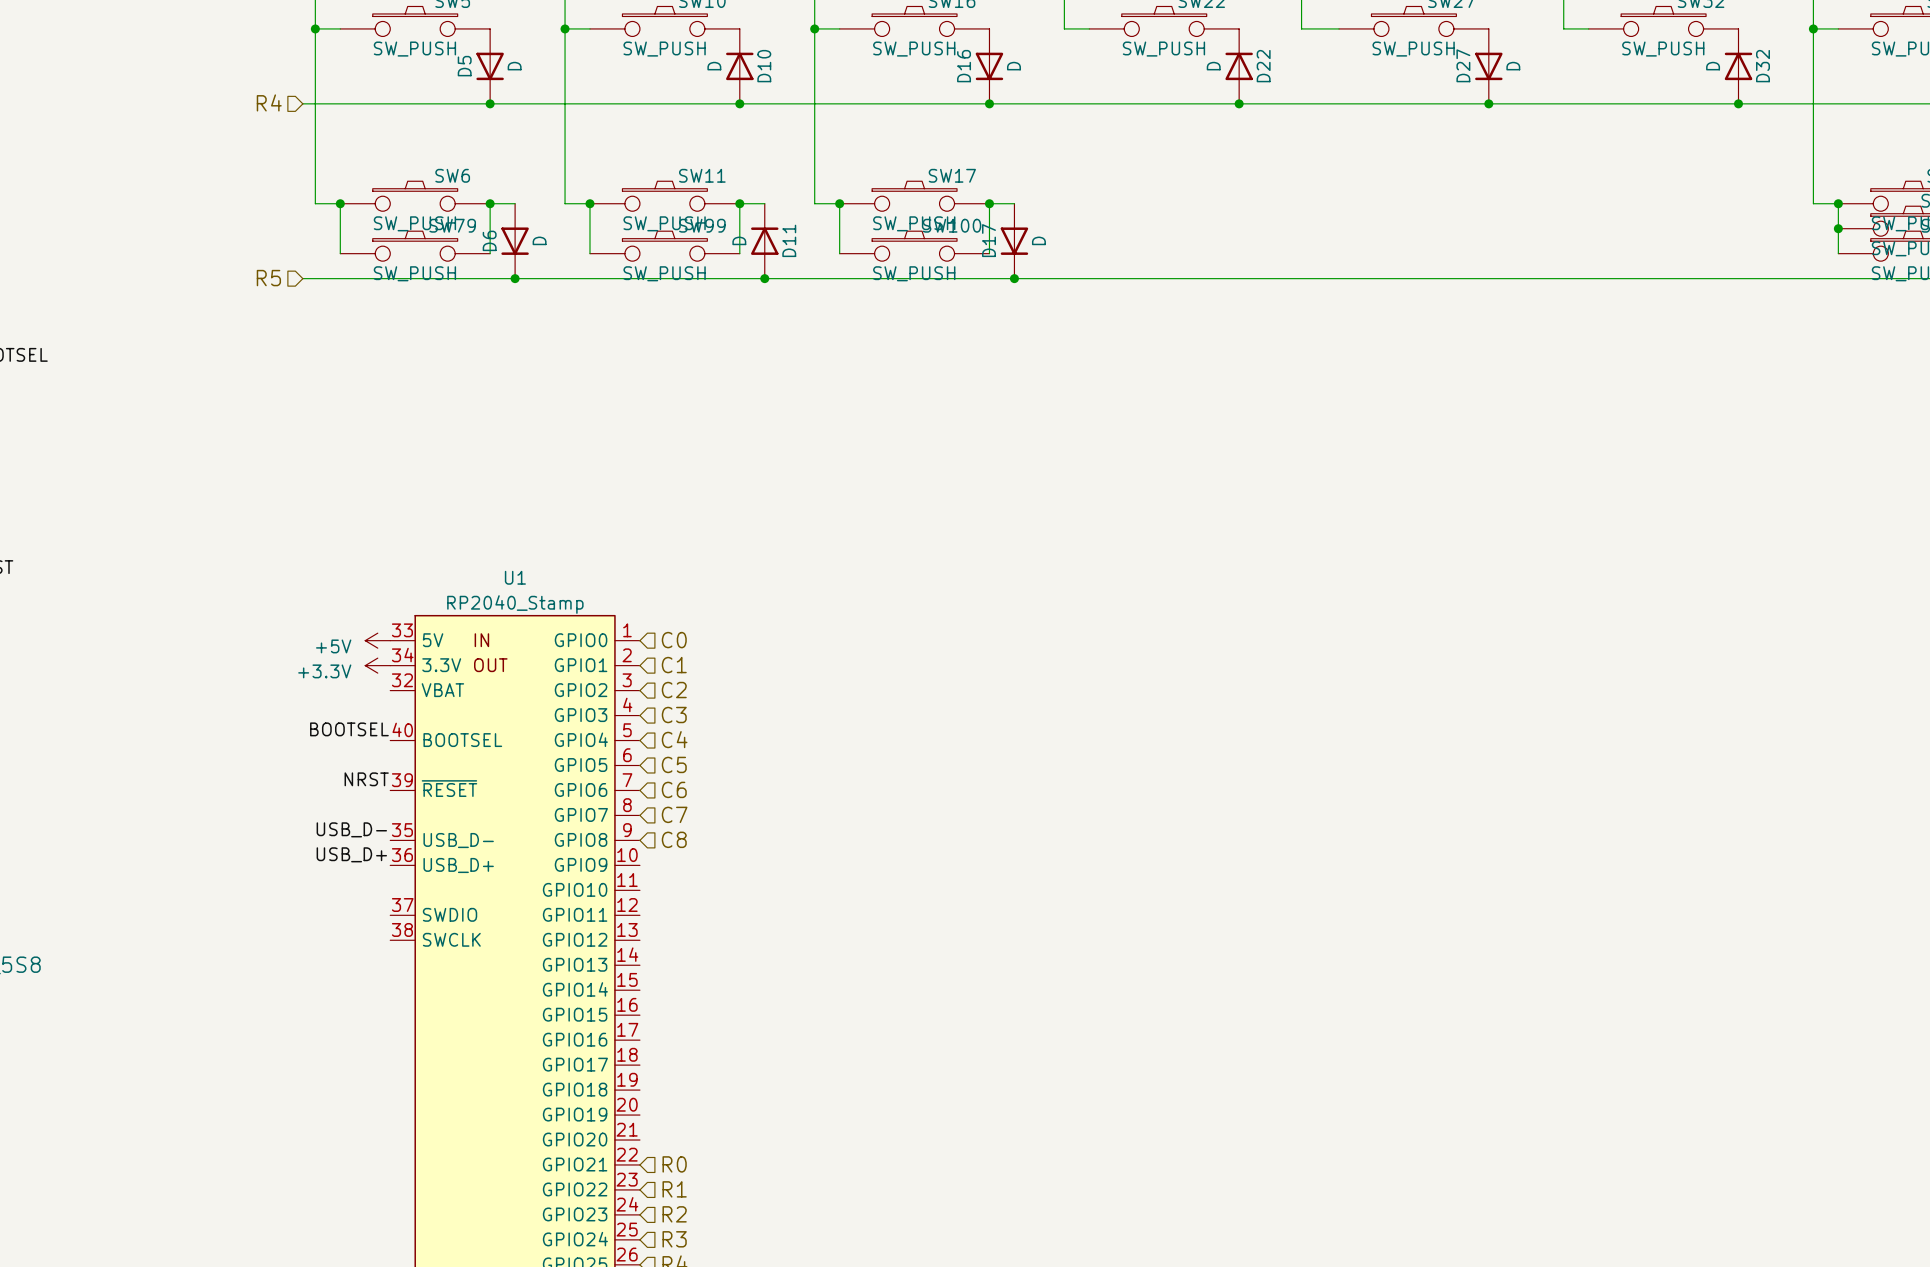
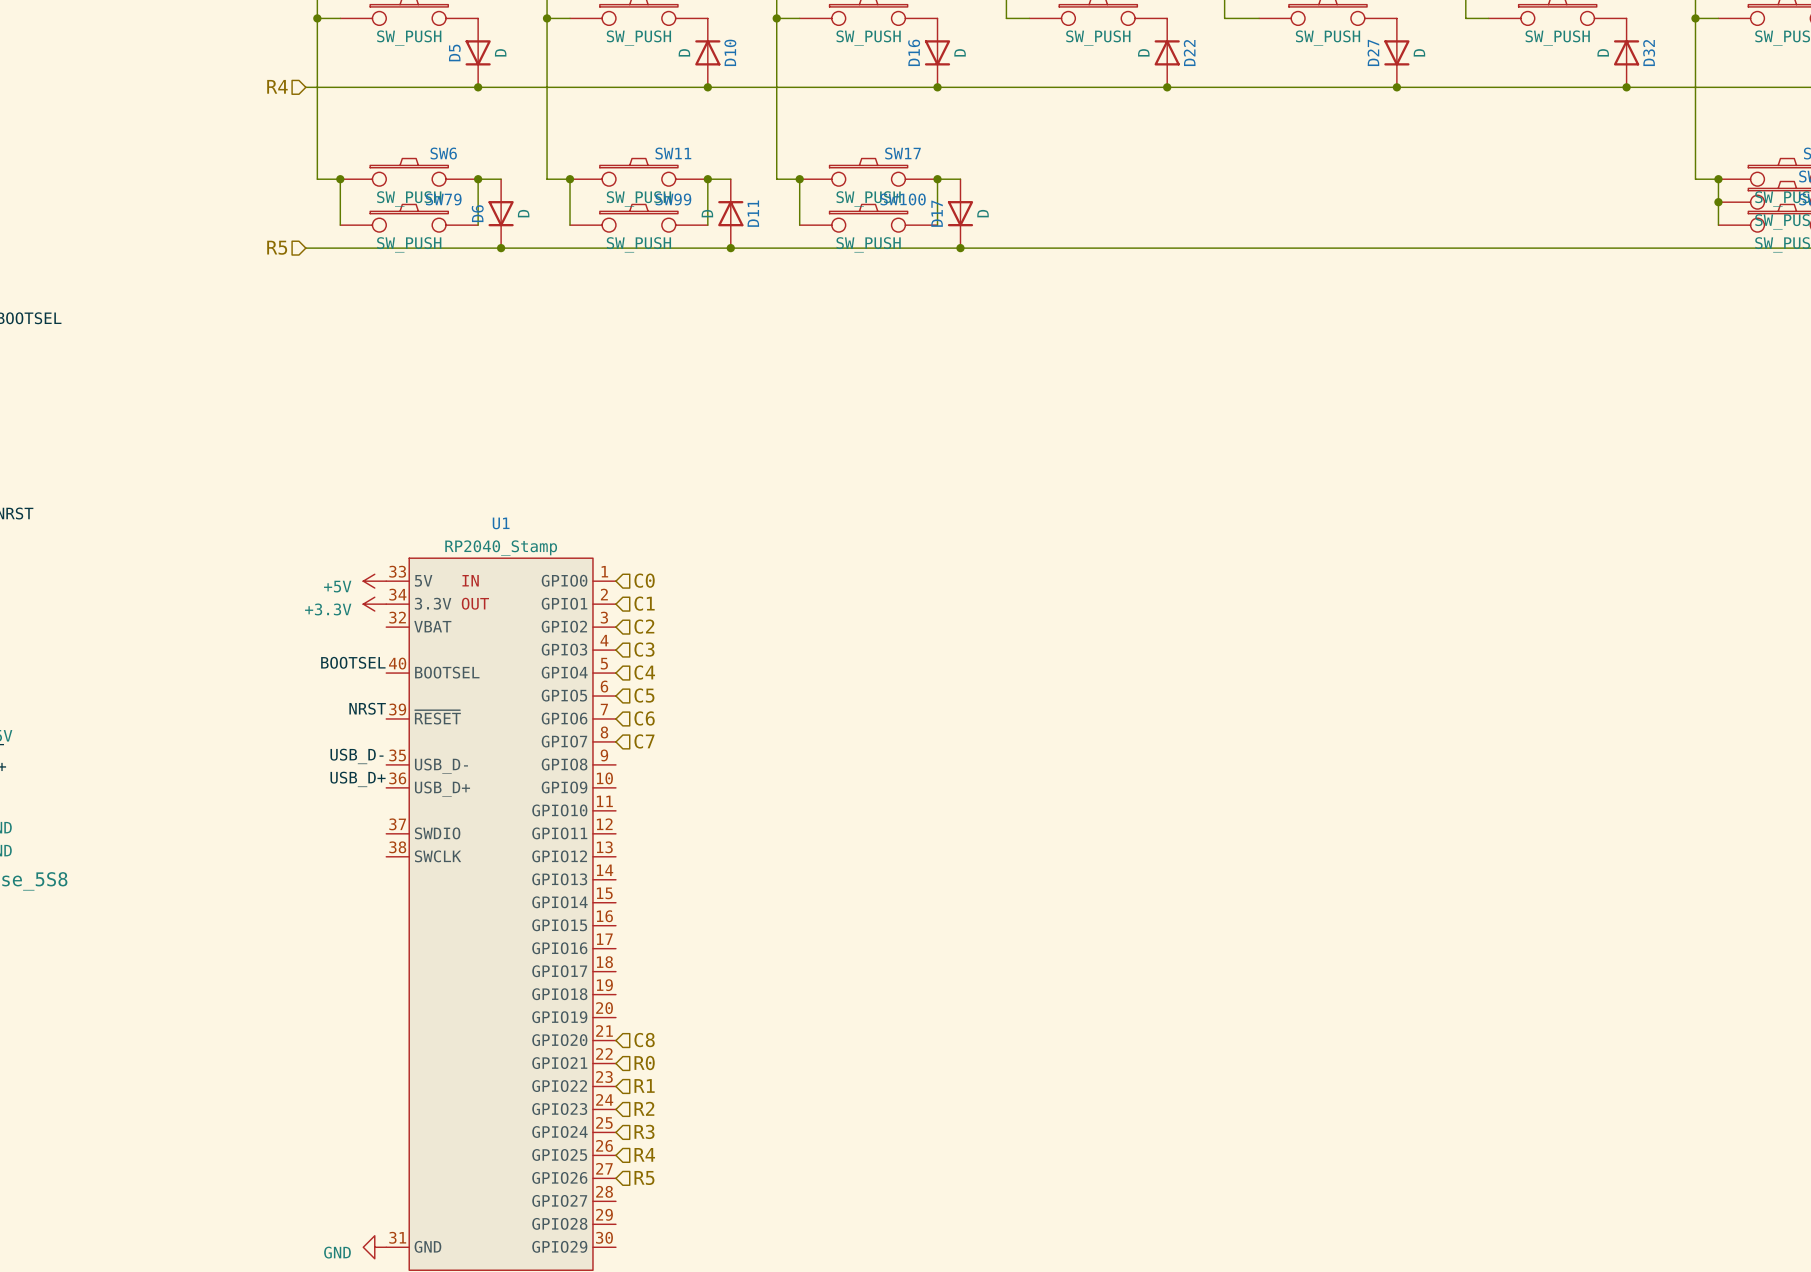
hierarchical label: C8 (674, 839) -> none
hierarchical label: none -> C8 (644, 1040)

